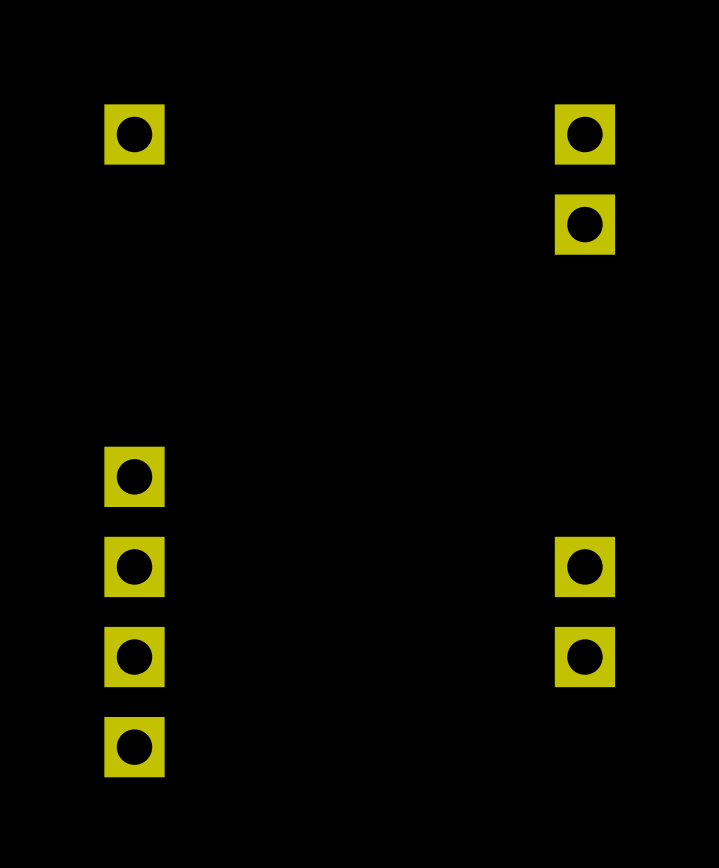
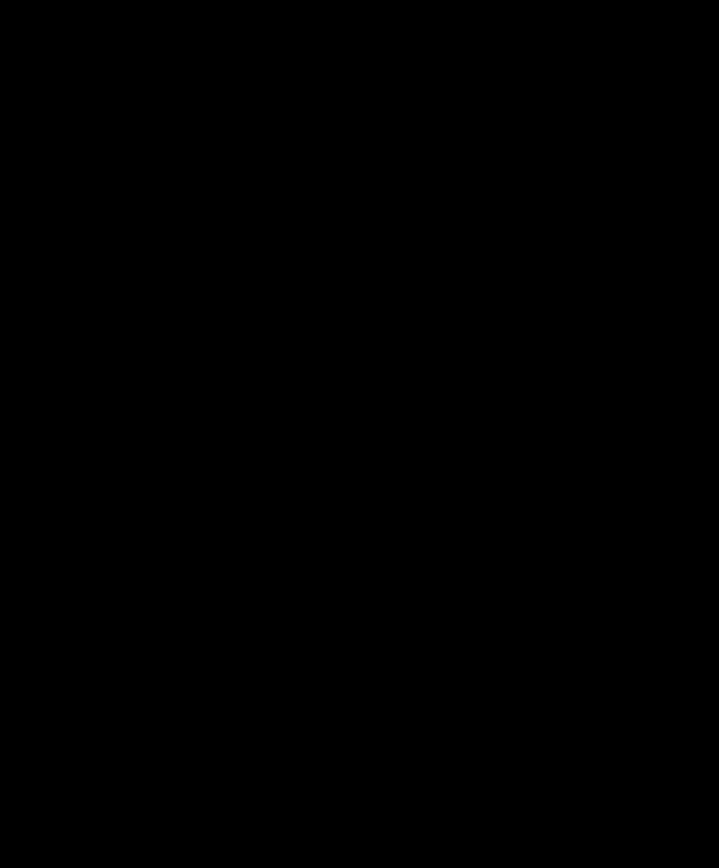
part: (134, 134) -> none
part: (584, 134) -> none
part: (584, 224) -> none
part: (134, 476) -> none
part: (134, 566) -> none
part: (584, 566) -> none
part: (134, 657) -> none
part: (584, 657) -> none
part: (134, 747) -> none

